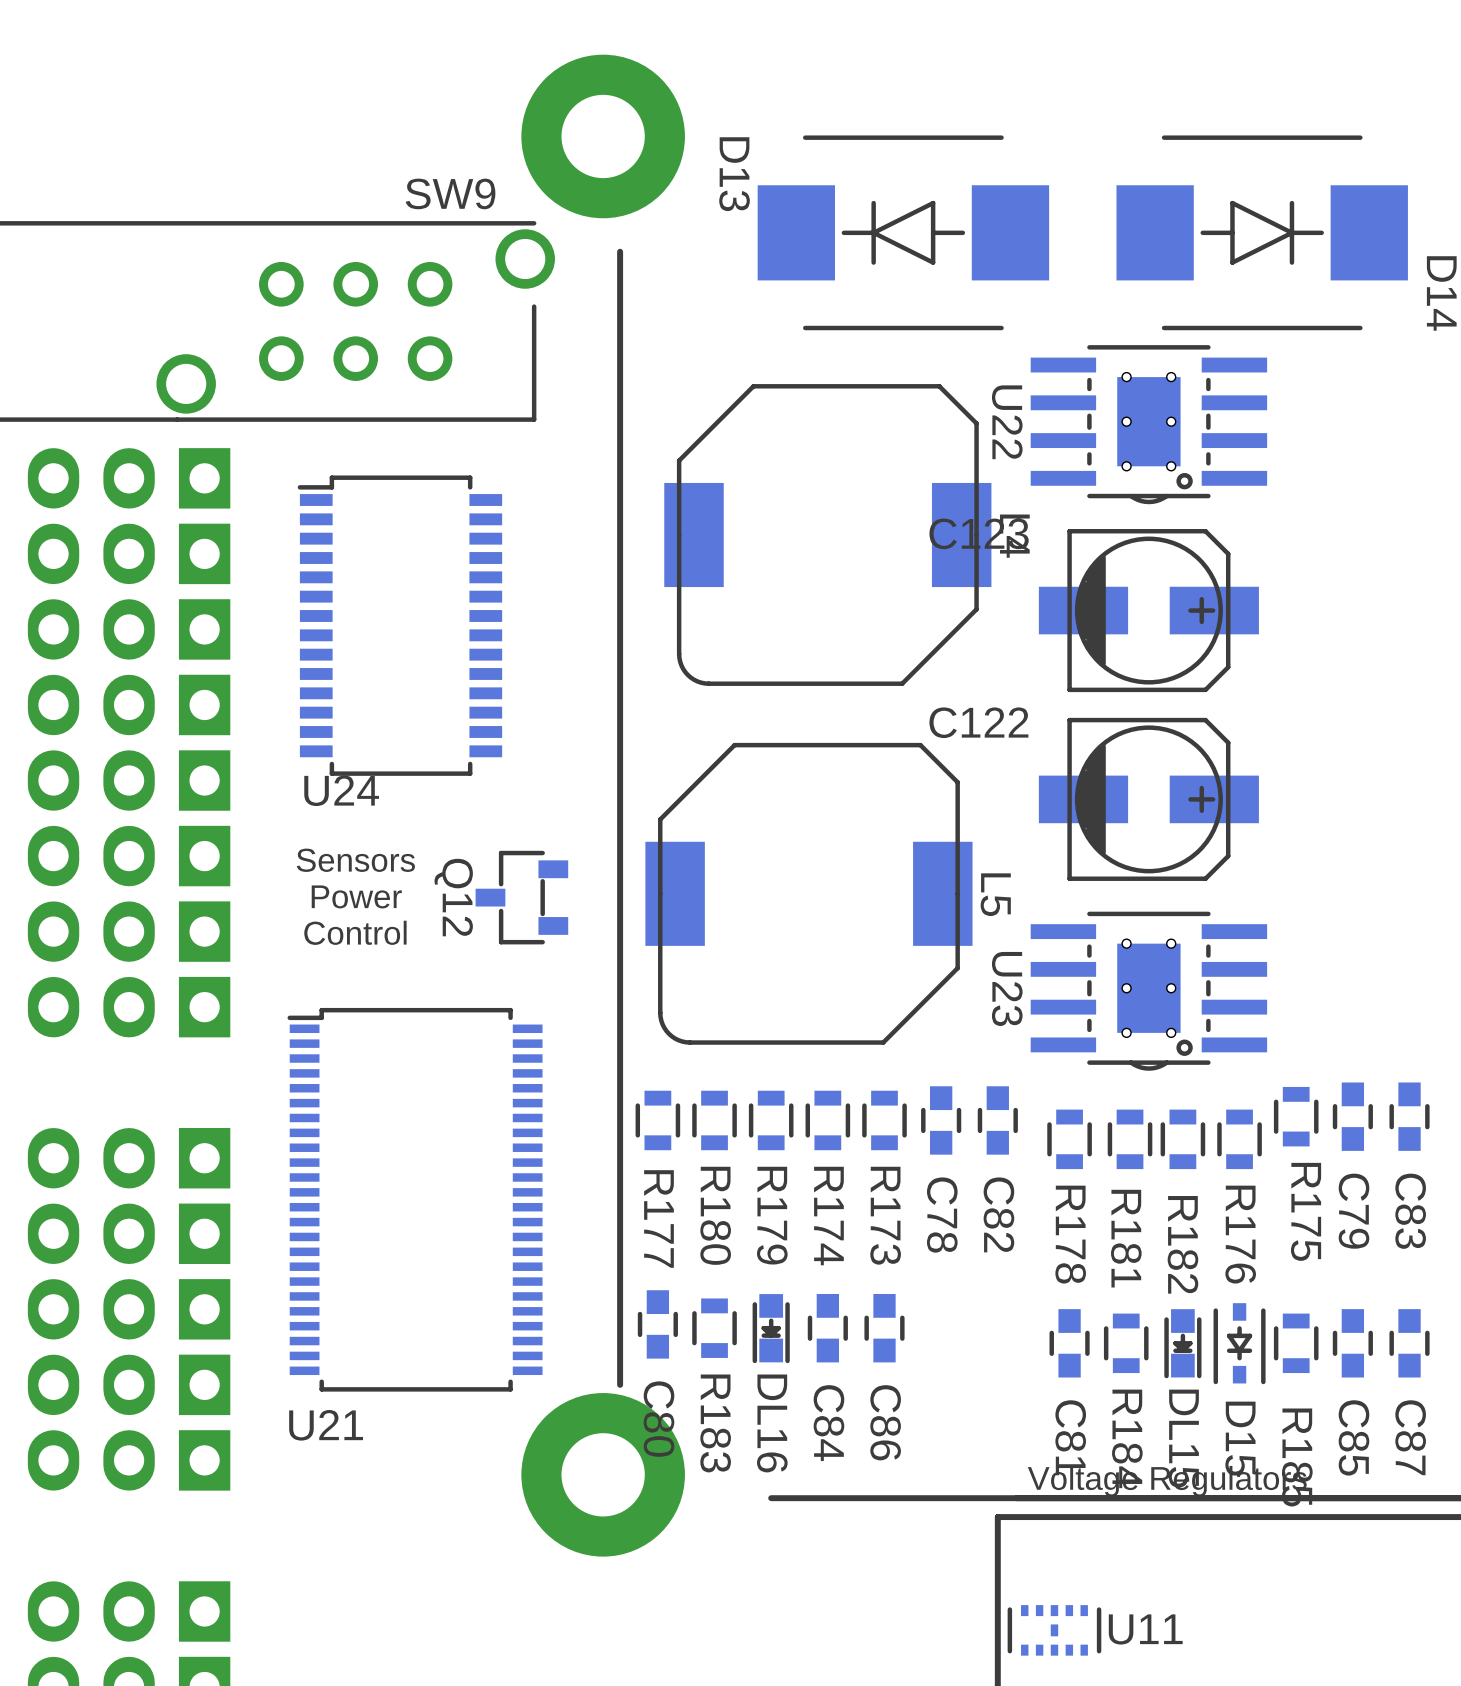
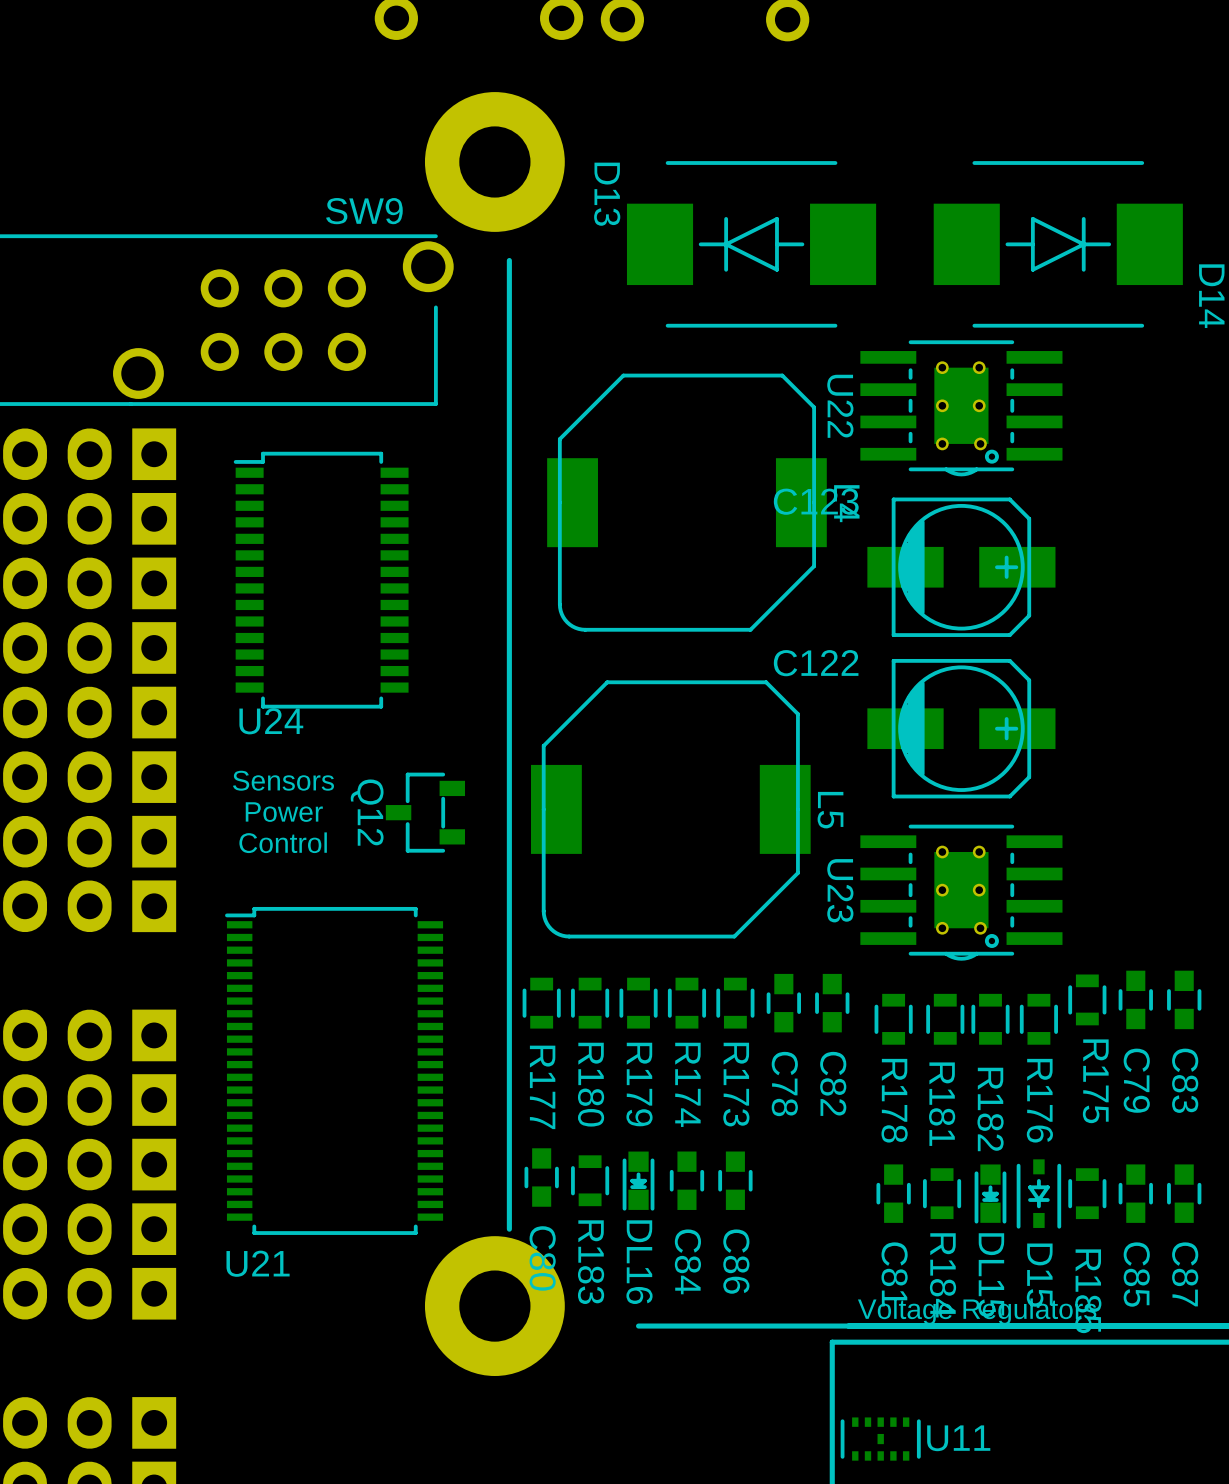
U22 footprint: [1030, 345, 1268, 505] -> [860, 340, 1063, 477]
U23 footprint: [1030, 911, 1268, 1071] -> [860, 824, 1063, 961]

